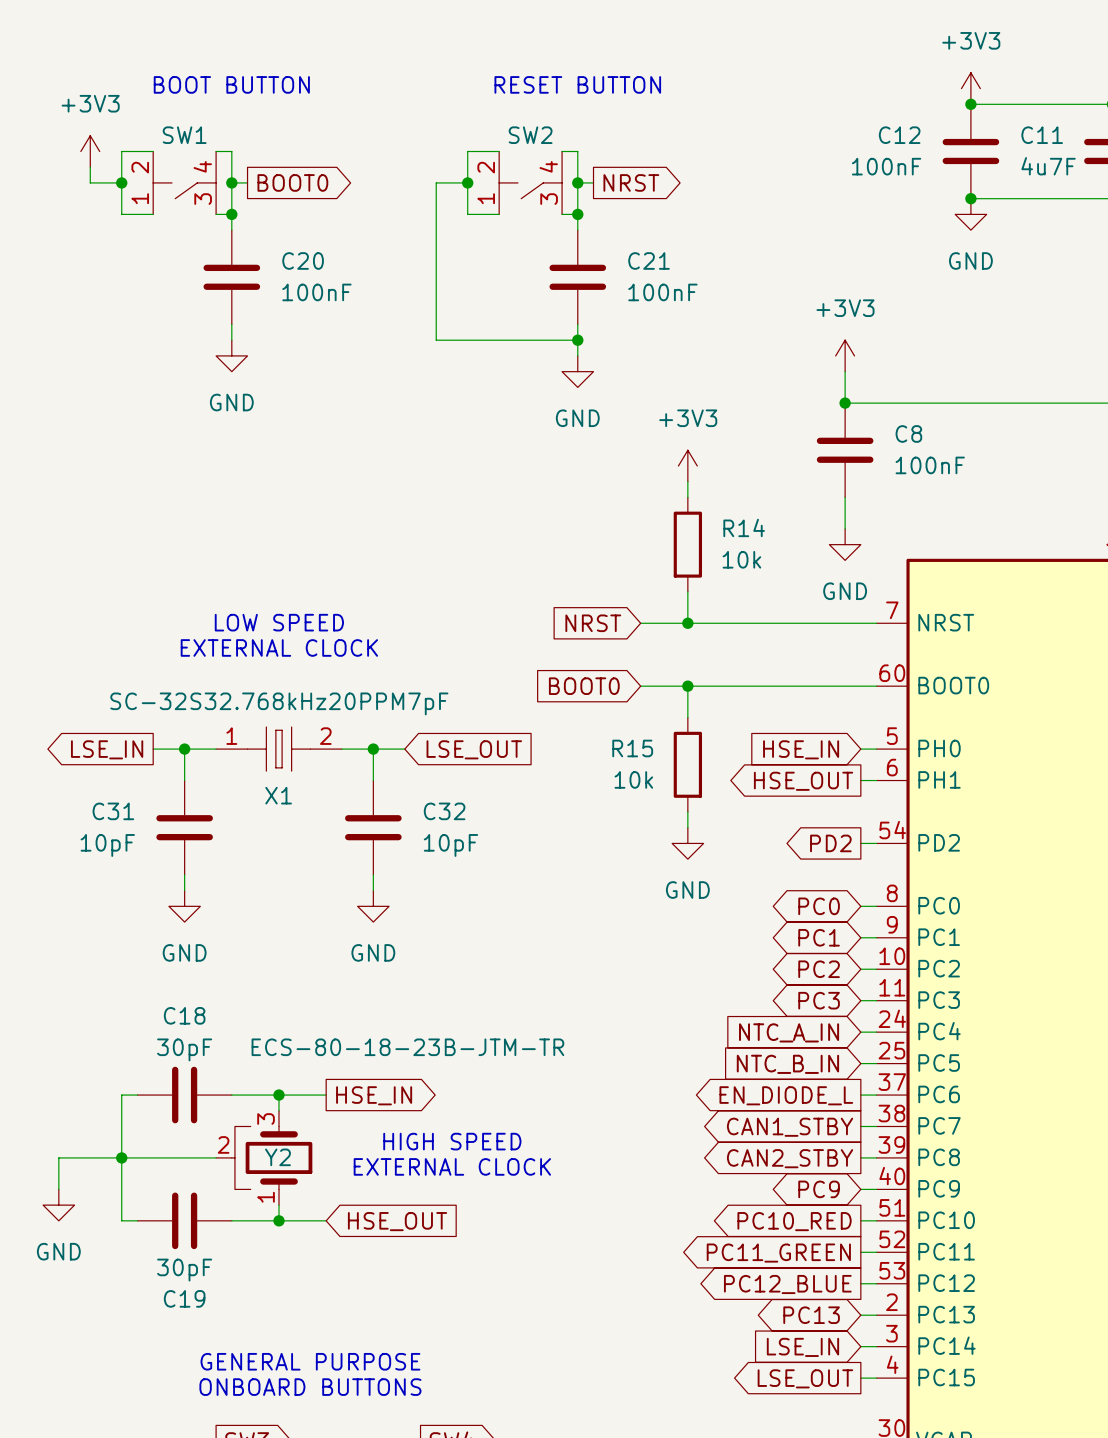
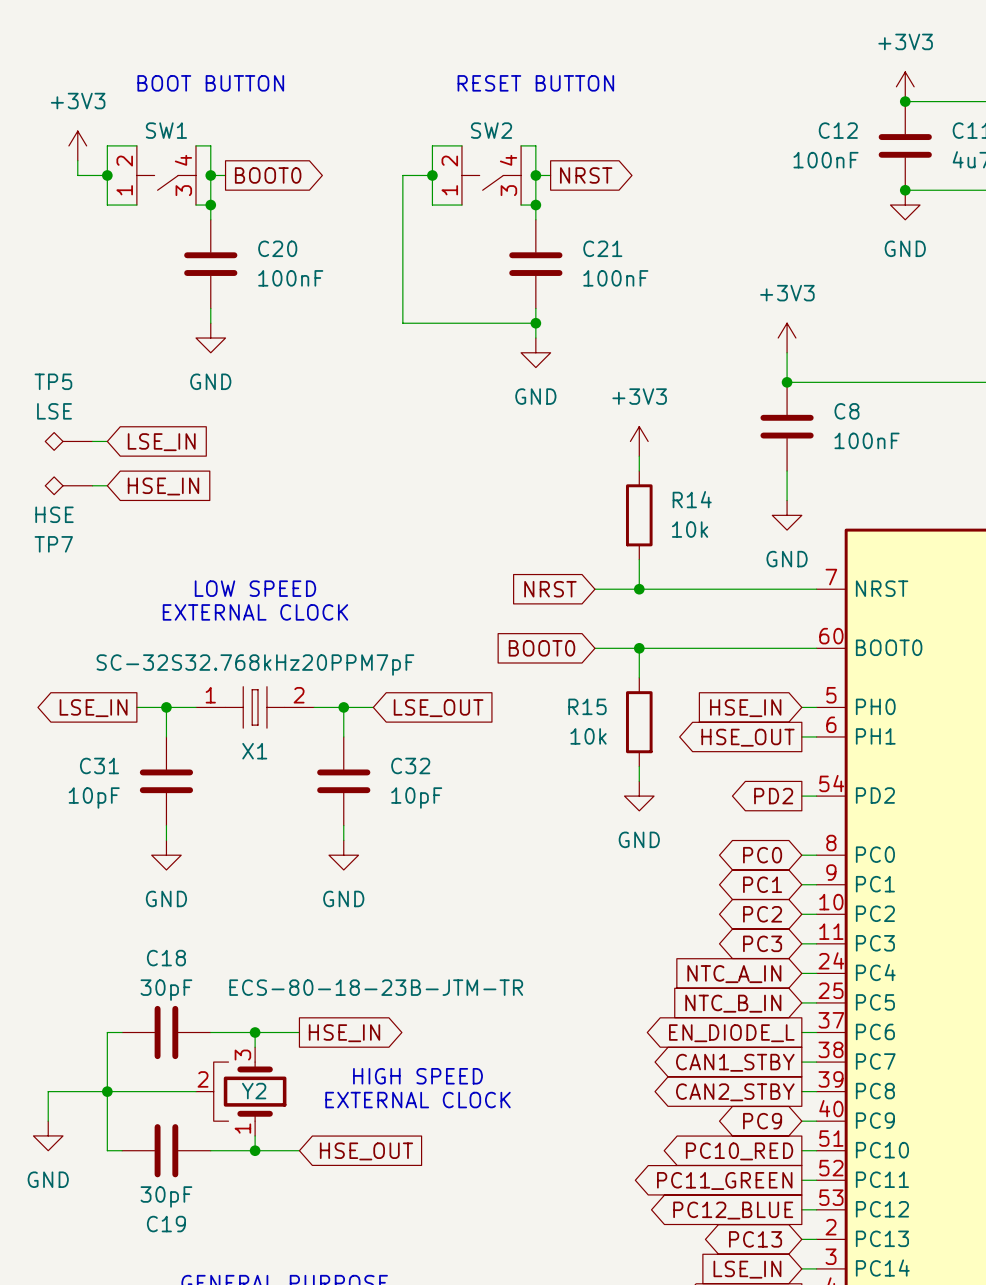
TP5: none -> LSE (68, 441)
wire: none -> (92, 441) (107, 441)
global label: none -> LSE_IN (161, 442)
TP7: none -> HSE (68, 485)
wire: none -> (92, 485) (107, 485)
global label: none -> HSE_IN (163, 486)

